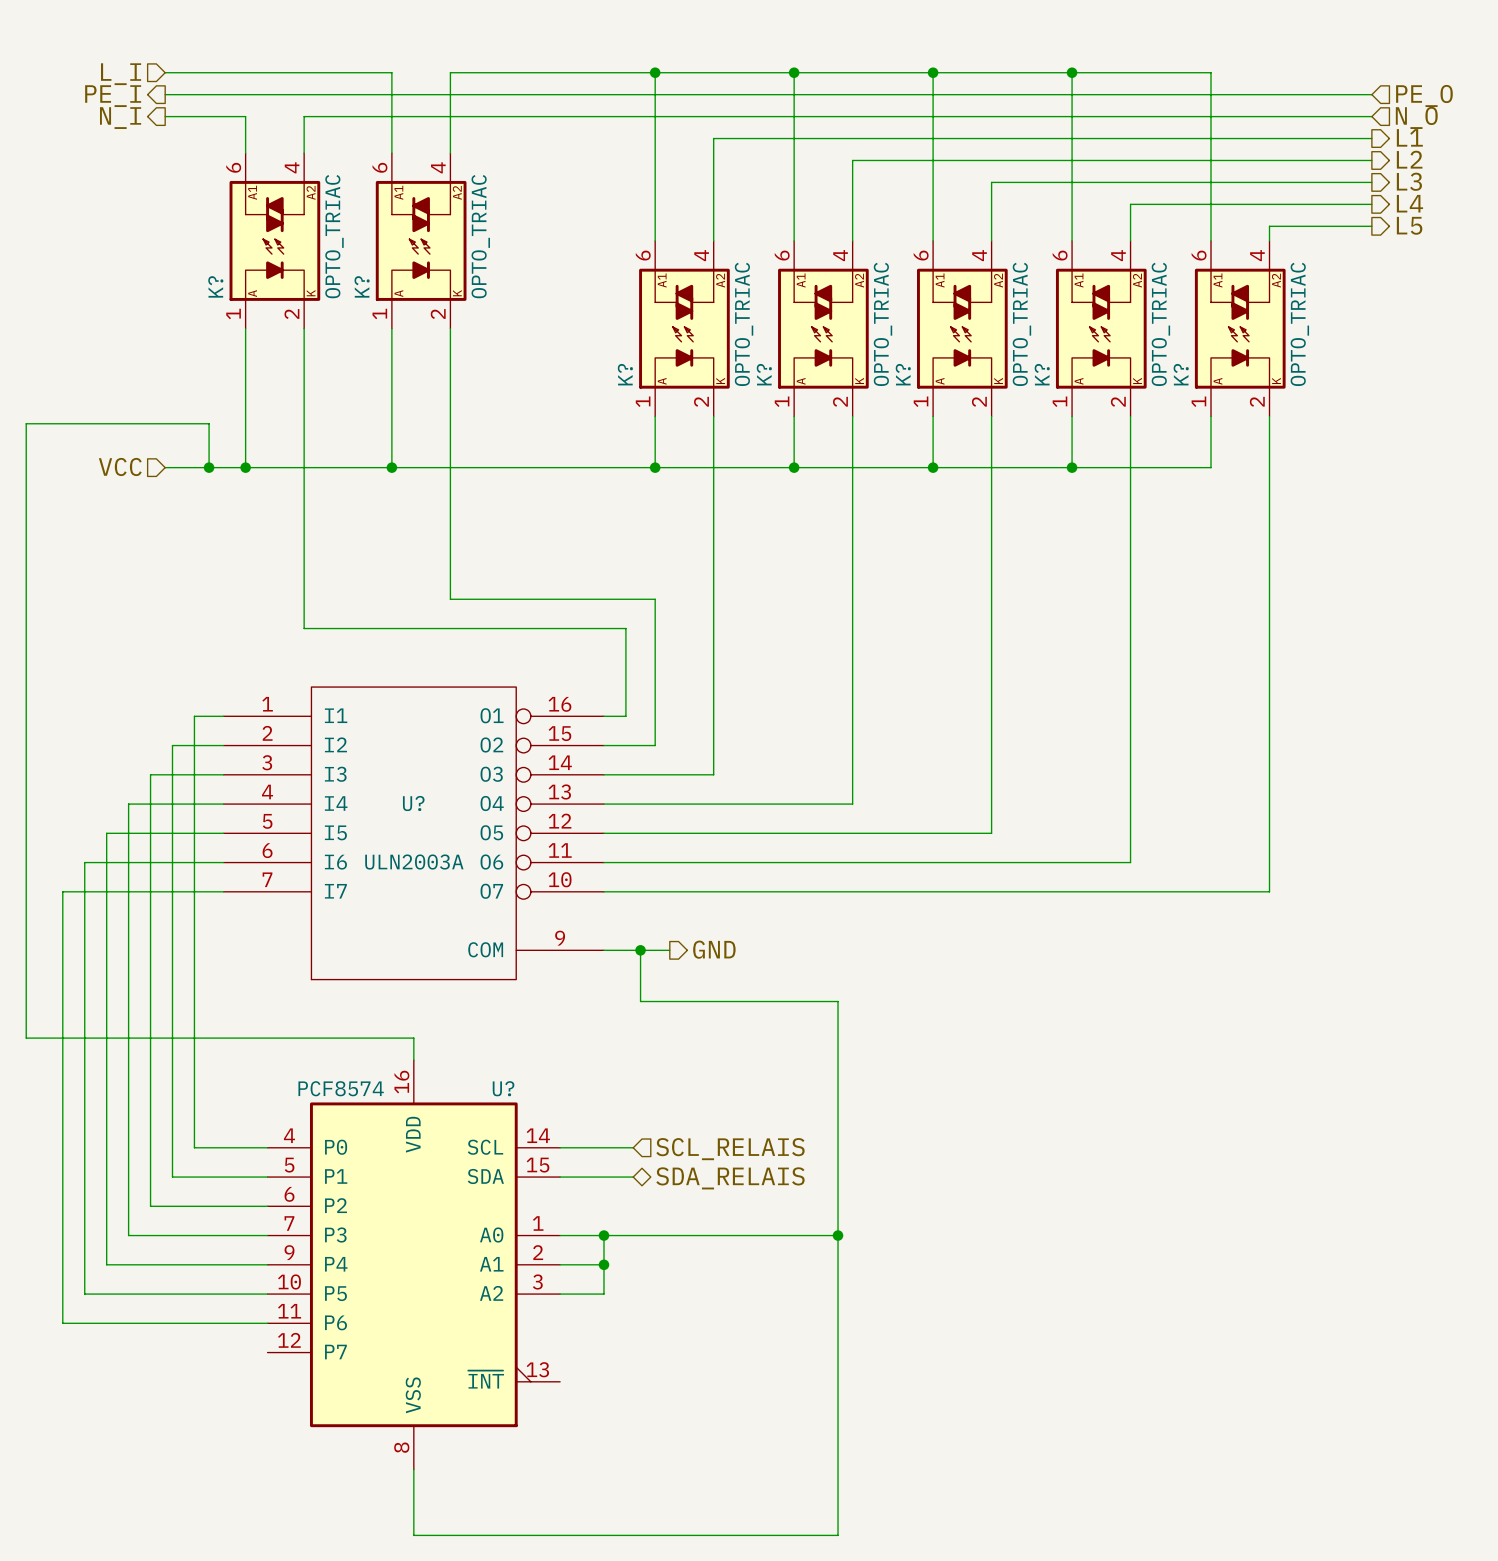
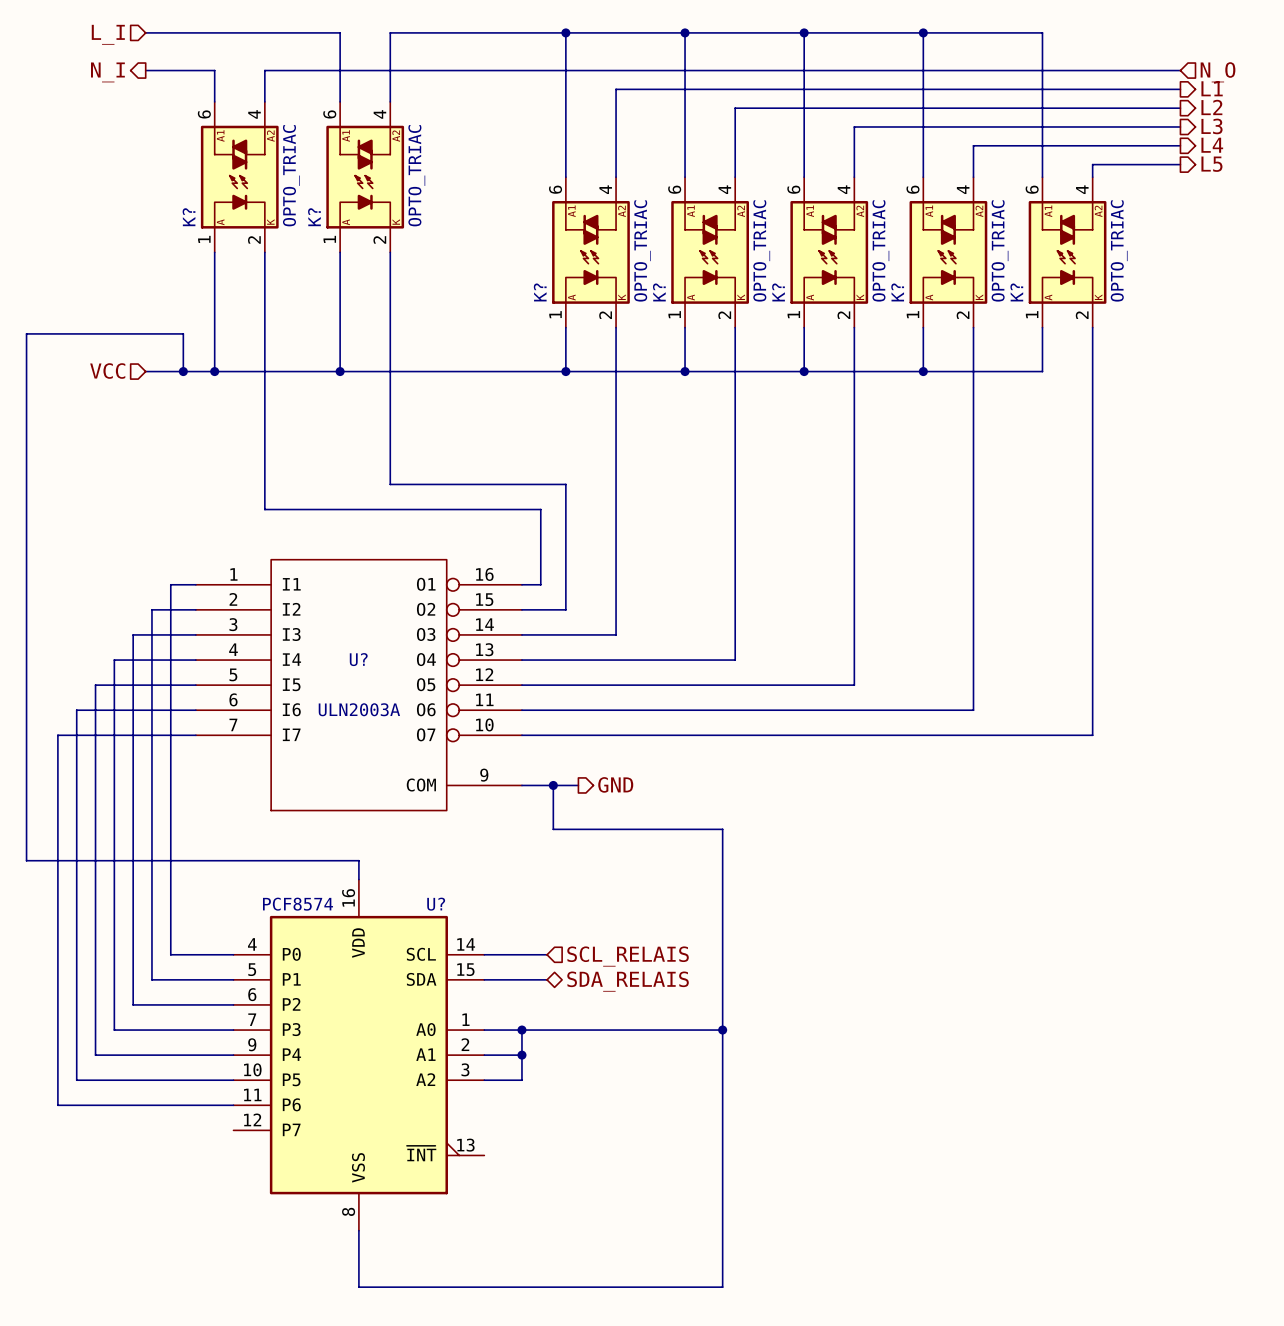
wire: (165, 94) (1371, 94) -> none
hierarchical label: PE_O (1424, 95) -> none
hierarchical label: PE_I (113, 96) -> none

